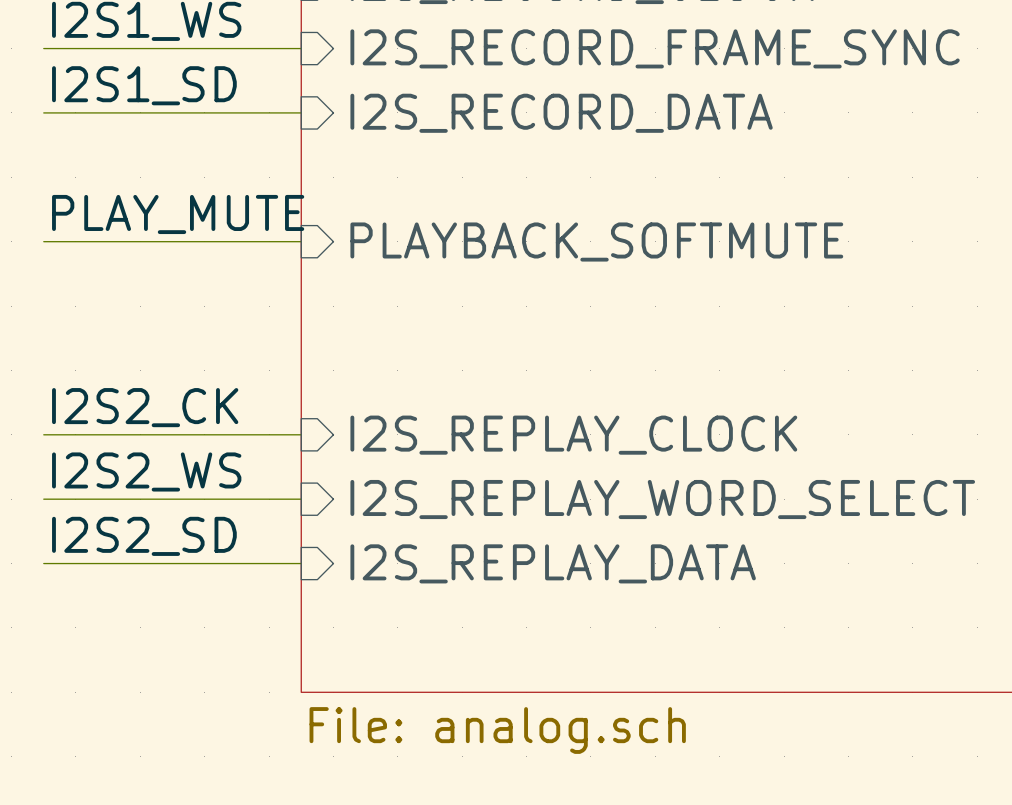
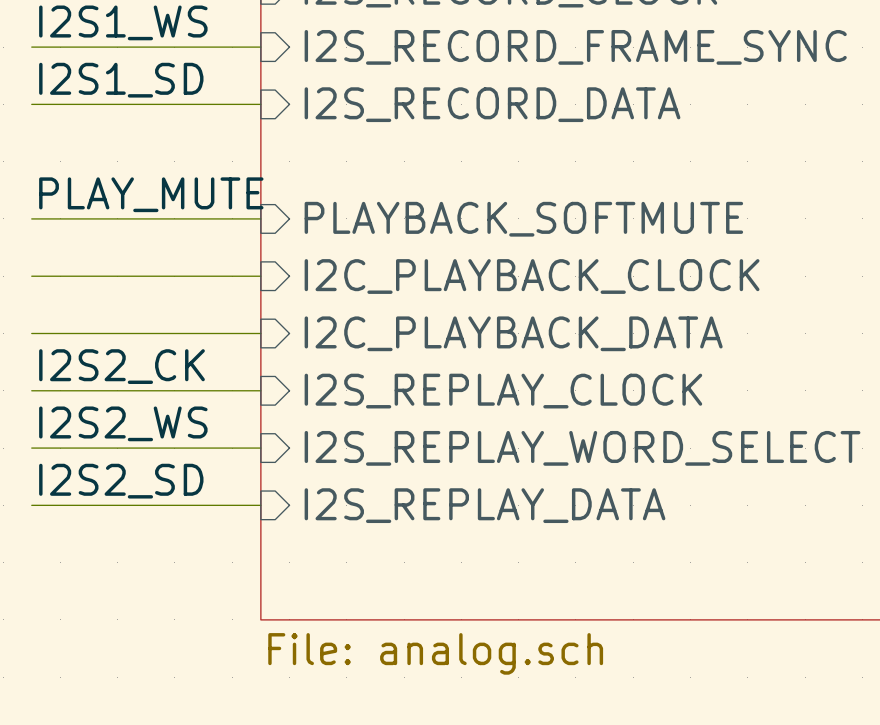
wire: none -> (31, 276) (260, 276)
sheet pin: none -> I2C_PLAYBACK_CLOCK (532, 276)
wire: none -> (31, 333) (260, 333)
sheet pin: none -> I2C_PLAYBACK_DATA (513, 333)

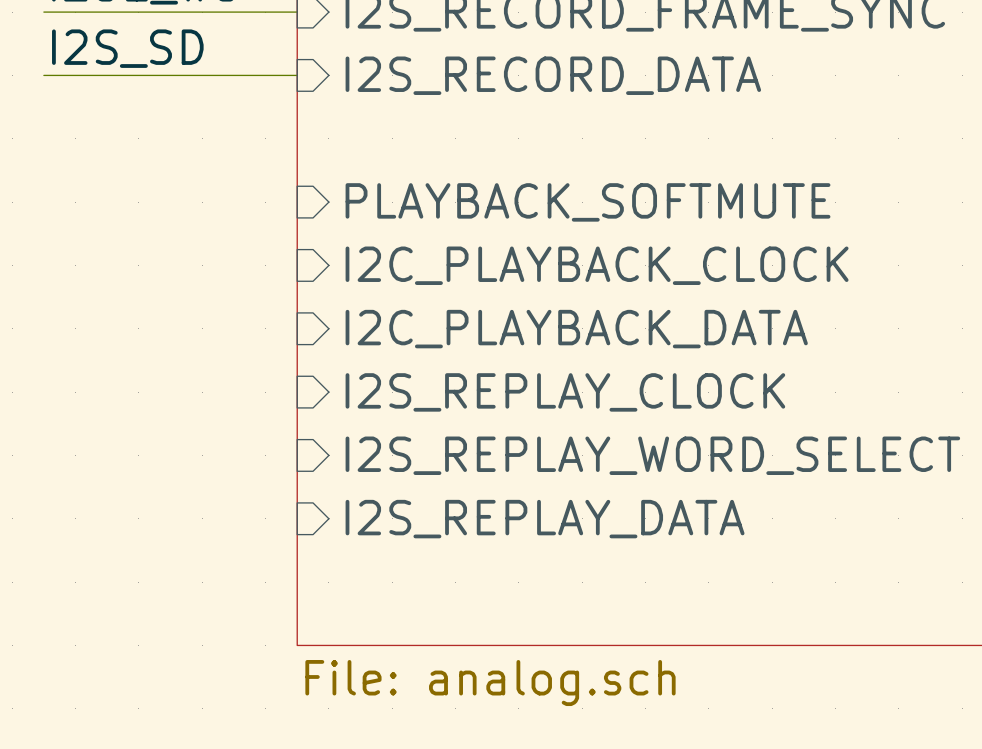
label: I2S1_SD (121, 80) -> I2S_SD (127, 48)
label: PLAY_MUTE (151, 194) -> none
wire: (31, 218) (260, 218) -> none
wire: (31, 276) (260, 276) -> none
wire: (31, 333) (260, 333) -> none
label: I2S2_CK (121, 366) -> none
wire: (31, 390) (260, 390) -> none
label: I2S2_WS (123, 423) -> none
wire: (31, 448) (260, 448) -> none
label: I2S2_SD (121, 481) -> none
wire: (31, 505) (260, 505) -> none

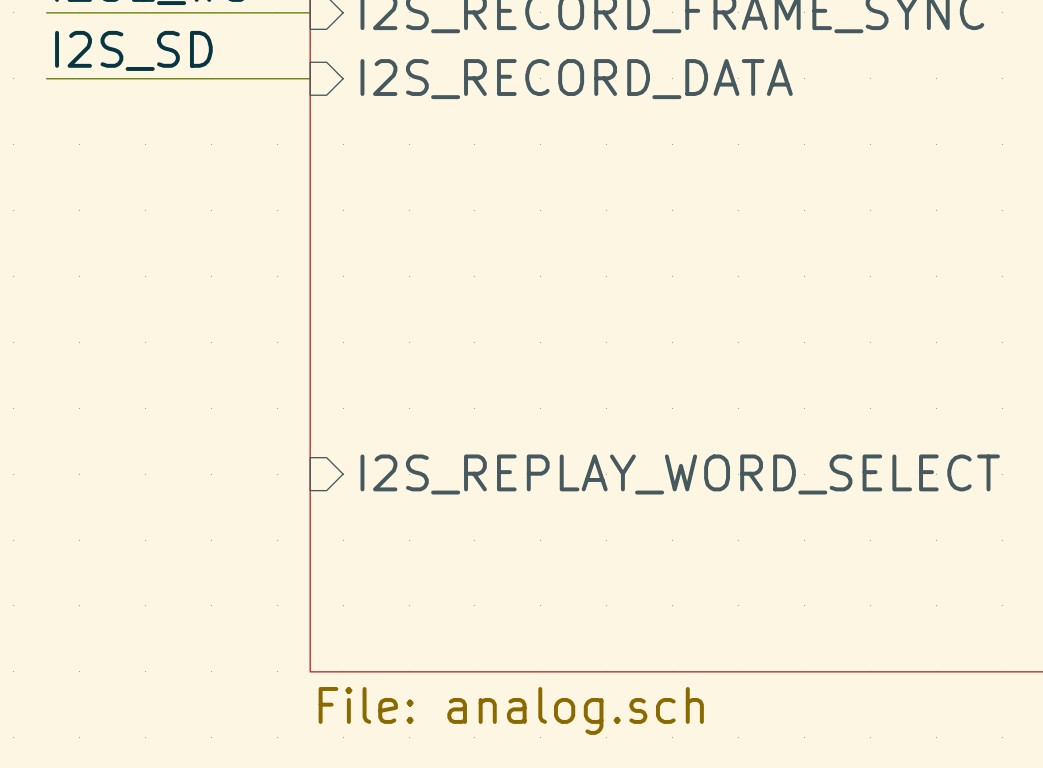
sheet pin: PLAYBACK_SOFTMUTE (588, 202) -> none
sheet pin: I2C_PLAYBACK_CLOCK (597, 265) -> none
sheet pin: I2C_PLAYBACK_DATA (576, 329) -> none
sheet pin: I2S_REPLAY_CLOCK (565, 392) -> none
sheet pin: I2S_REPLAY_DATA (545, 519) -> none

